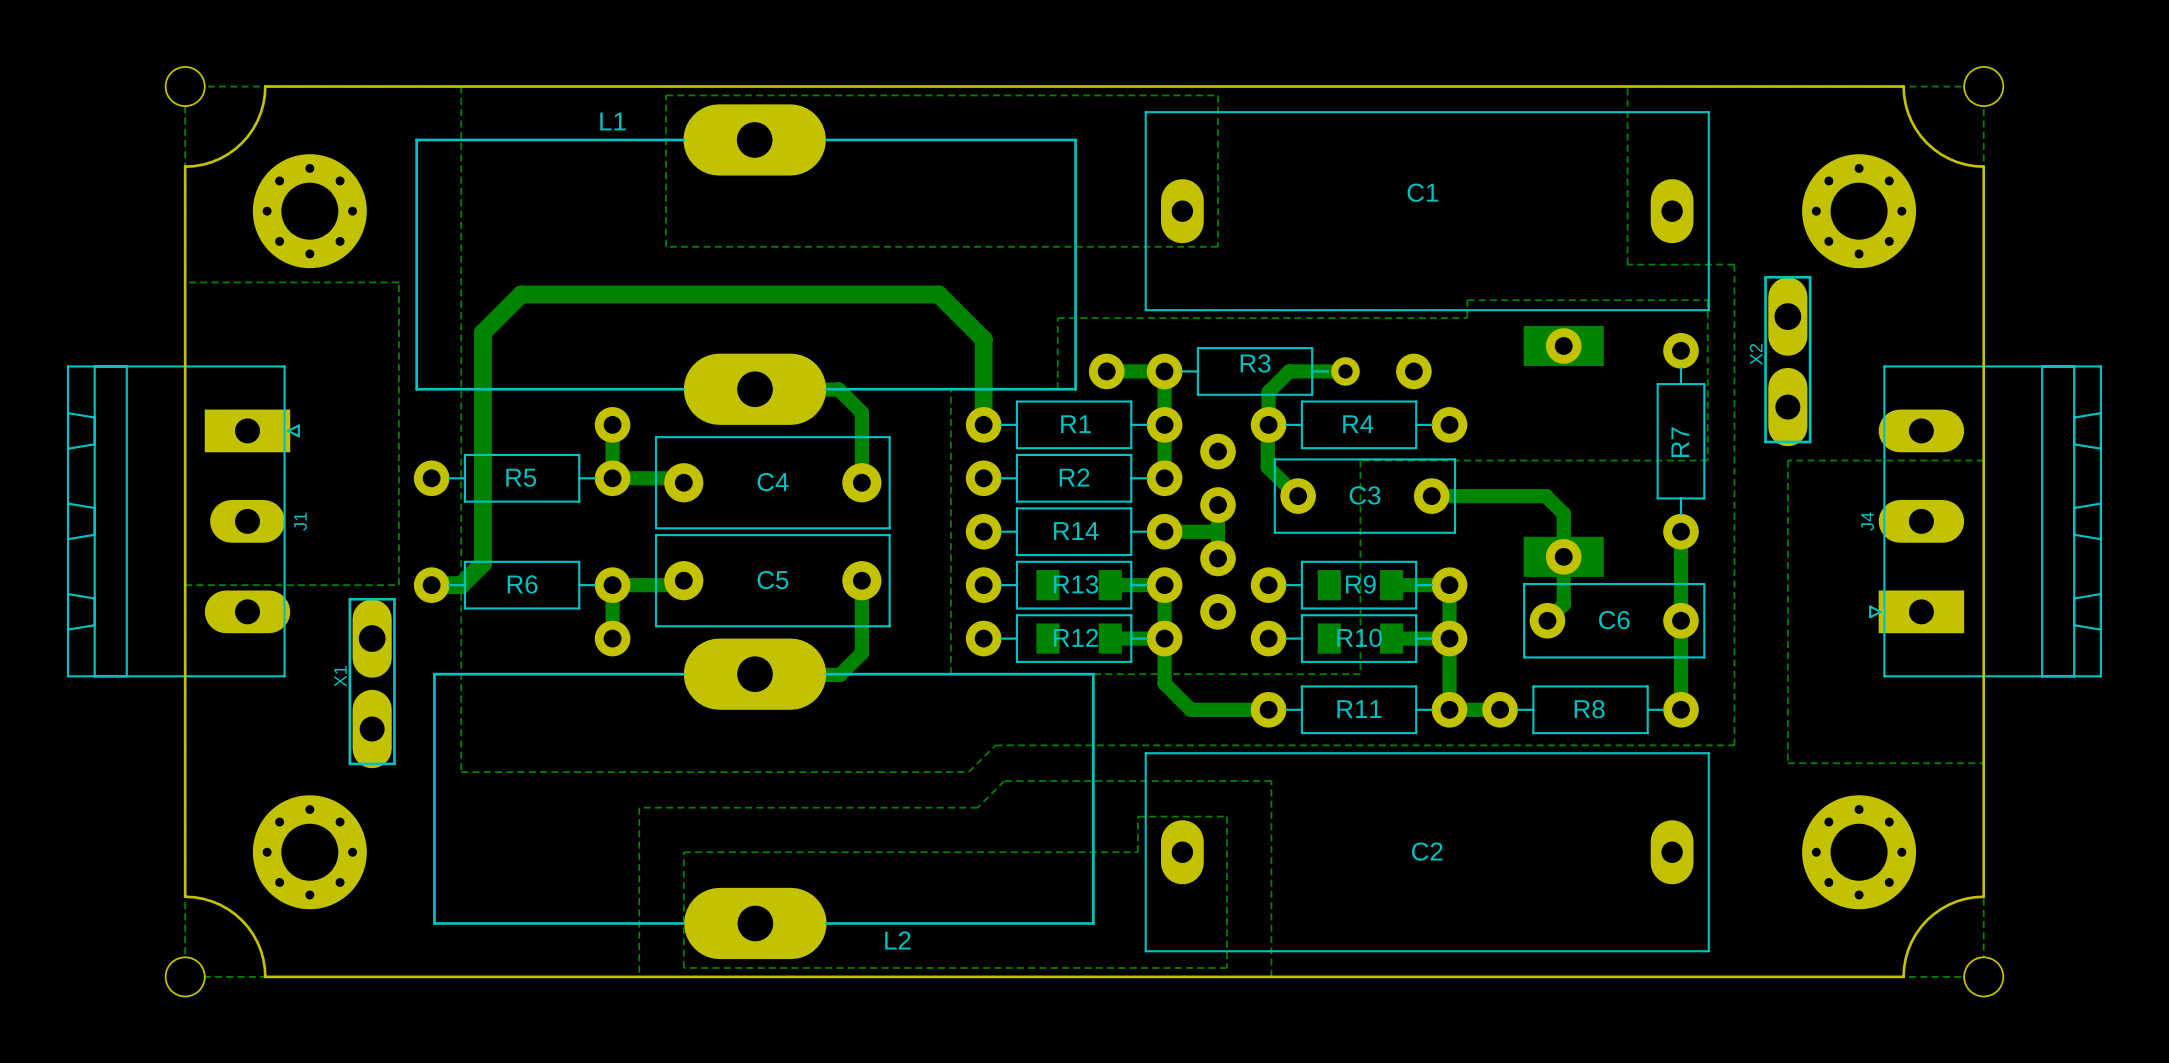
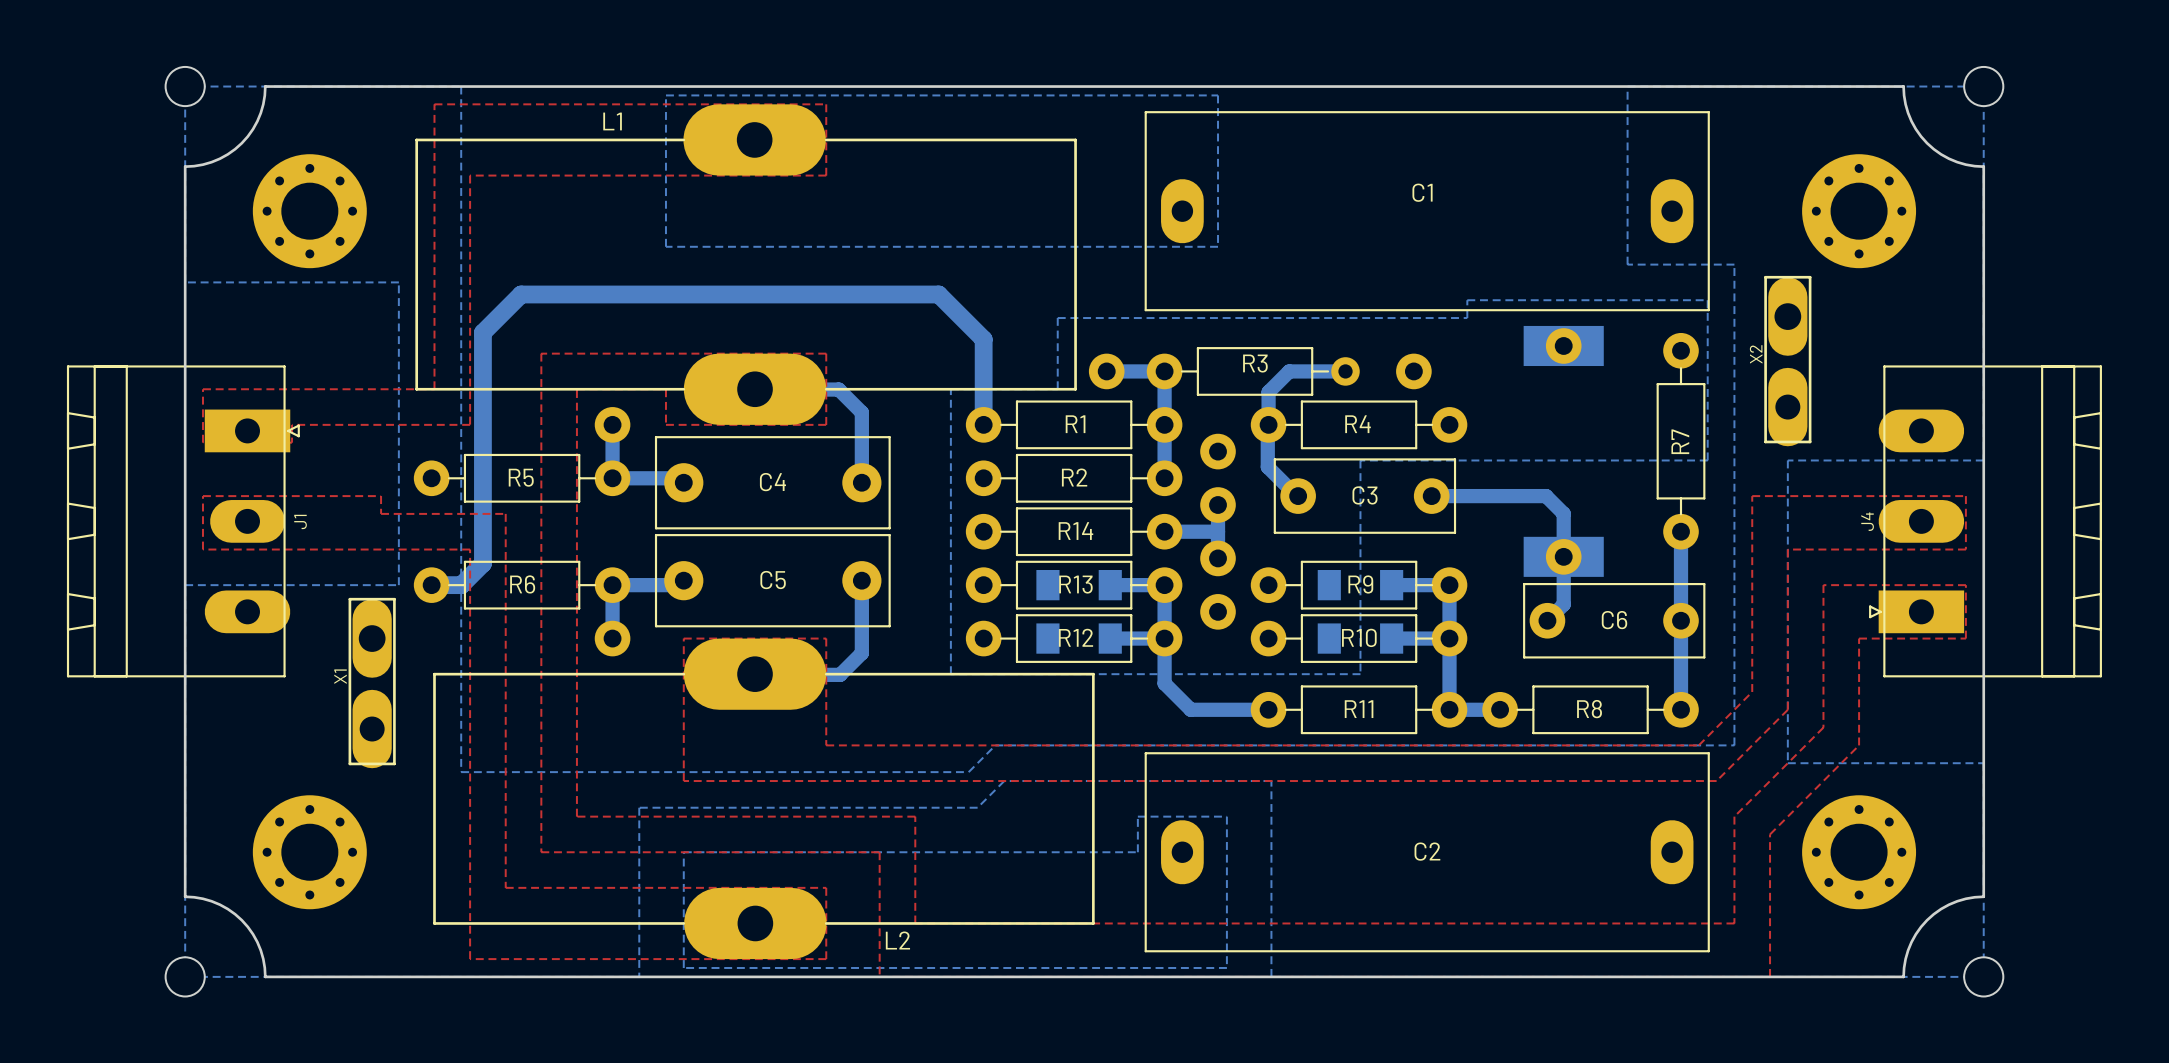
top zone outline: none -> (434, 104) (434, 389) (202, 389) (202, 442) (292, 442) (292, 424) (470, 424) (470, 175) (826, 175) (826, 104) (434, 104)
top zone outline: none -> (541, 353) (826, 353) (826, 424) (665, 424) (665, 389) (576, 389) (576, 816) (915, 816) (915, 923) (1734, 923) (1734, 816) (1823, 727) (1823, 585) (1965, 585) (1965, 638) (1859, 638) (1859, 745) (1770, 834) (1770, 976) (879, 976) (879, 852) (541, 852) (541, 353)
top zone outline: none -> (202, 496) (202, 549) (470, 549) (470, 959) (826, 959) (826, 887) (505, 887) (505, 513) (381, 513) (381, 496) (202, 496)
top zone outline: none -> (1752, 496) (1965, 496) (1965, 549) (1787, 549) (1787, 709) (1716, 781) (683, 781) (683, 638) (826, 638) (826, 745) (1698, 745) (1752, 691) (1752, 496)

